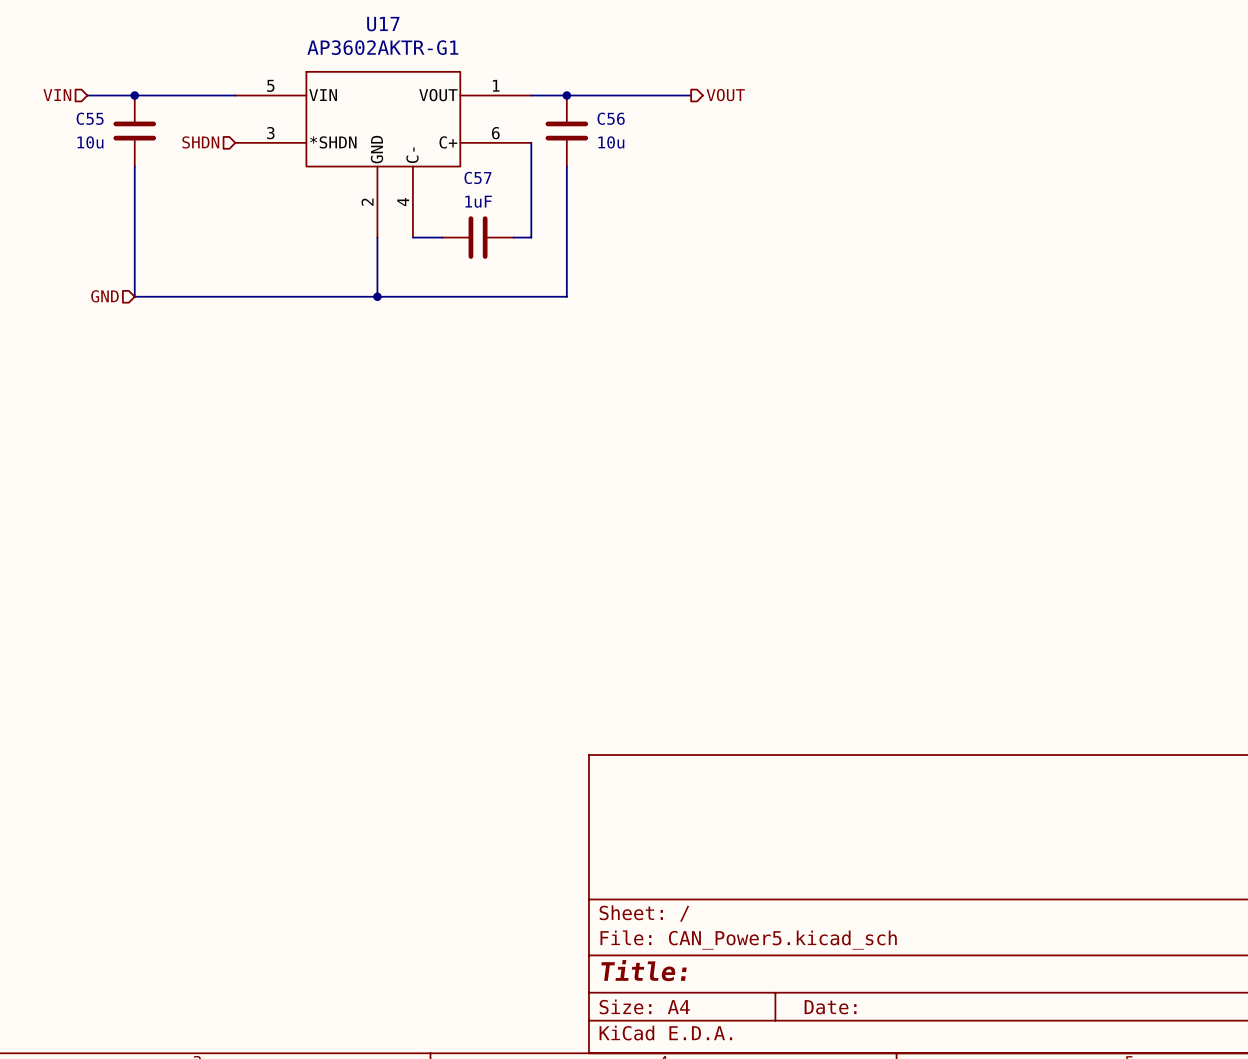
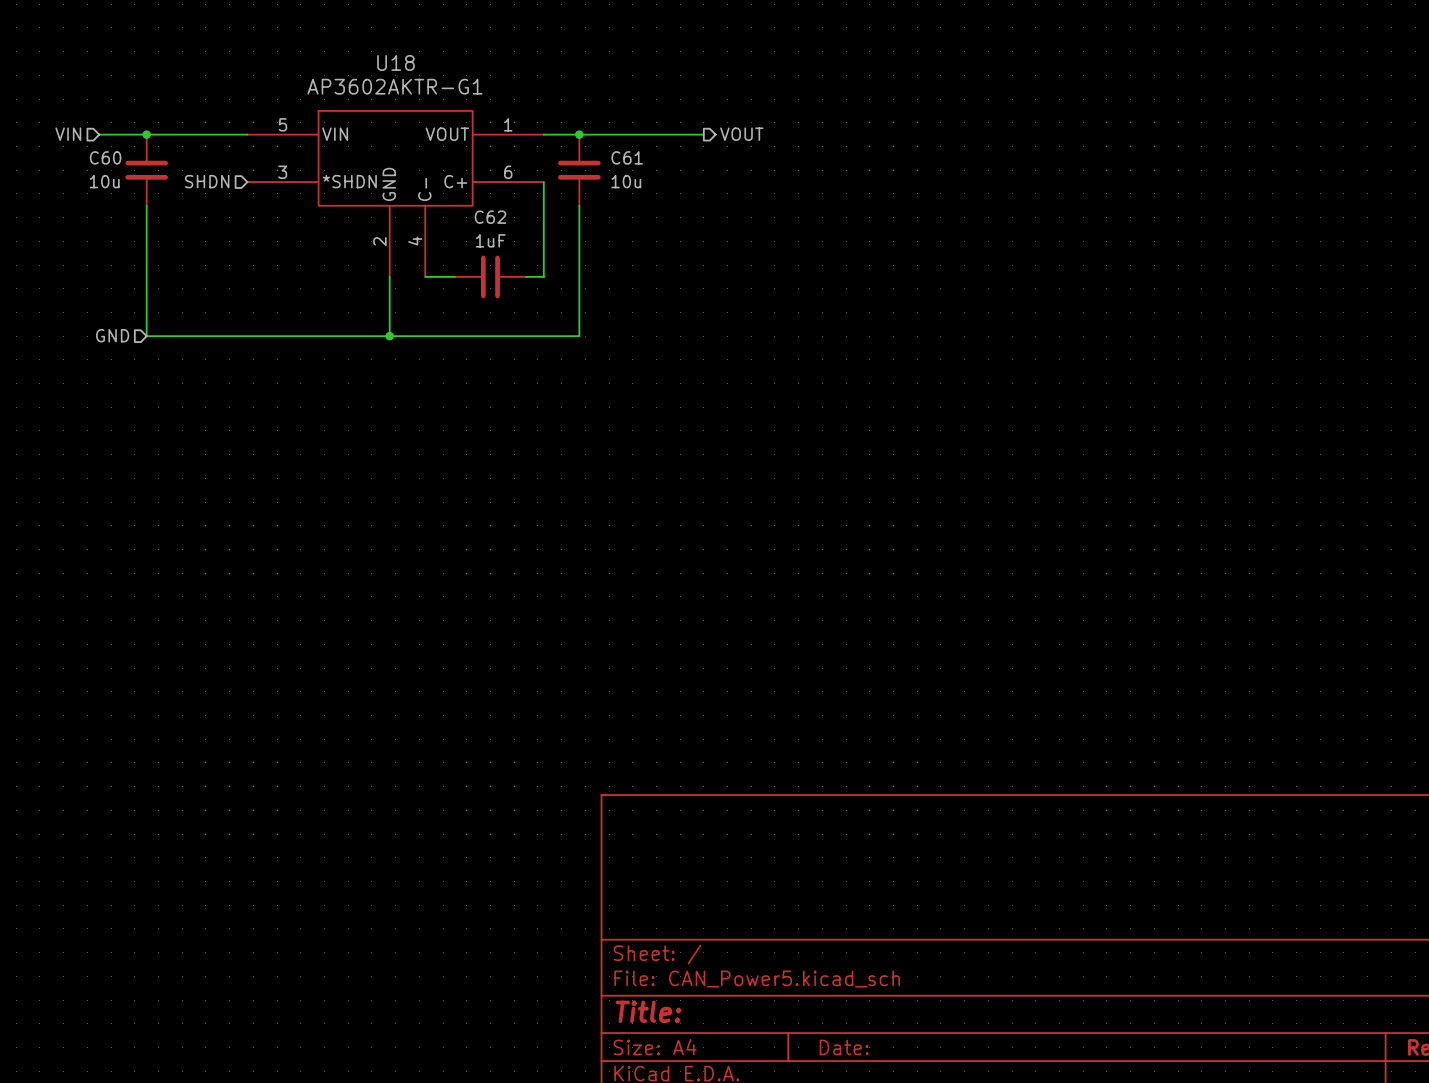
U17 name: U17 (383, 24) -> U18 (395, 62)
C55 name: C55 (90, 118) -> C60 (105, 157)
C56 name: C56 (611, 118) -> C61 (627, 157)
C57 name: C57 (477, 177) -> C62 (490, 217)

